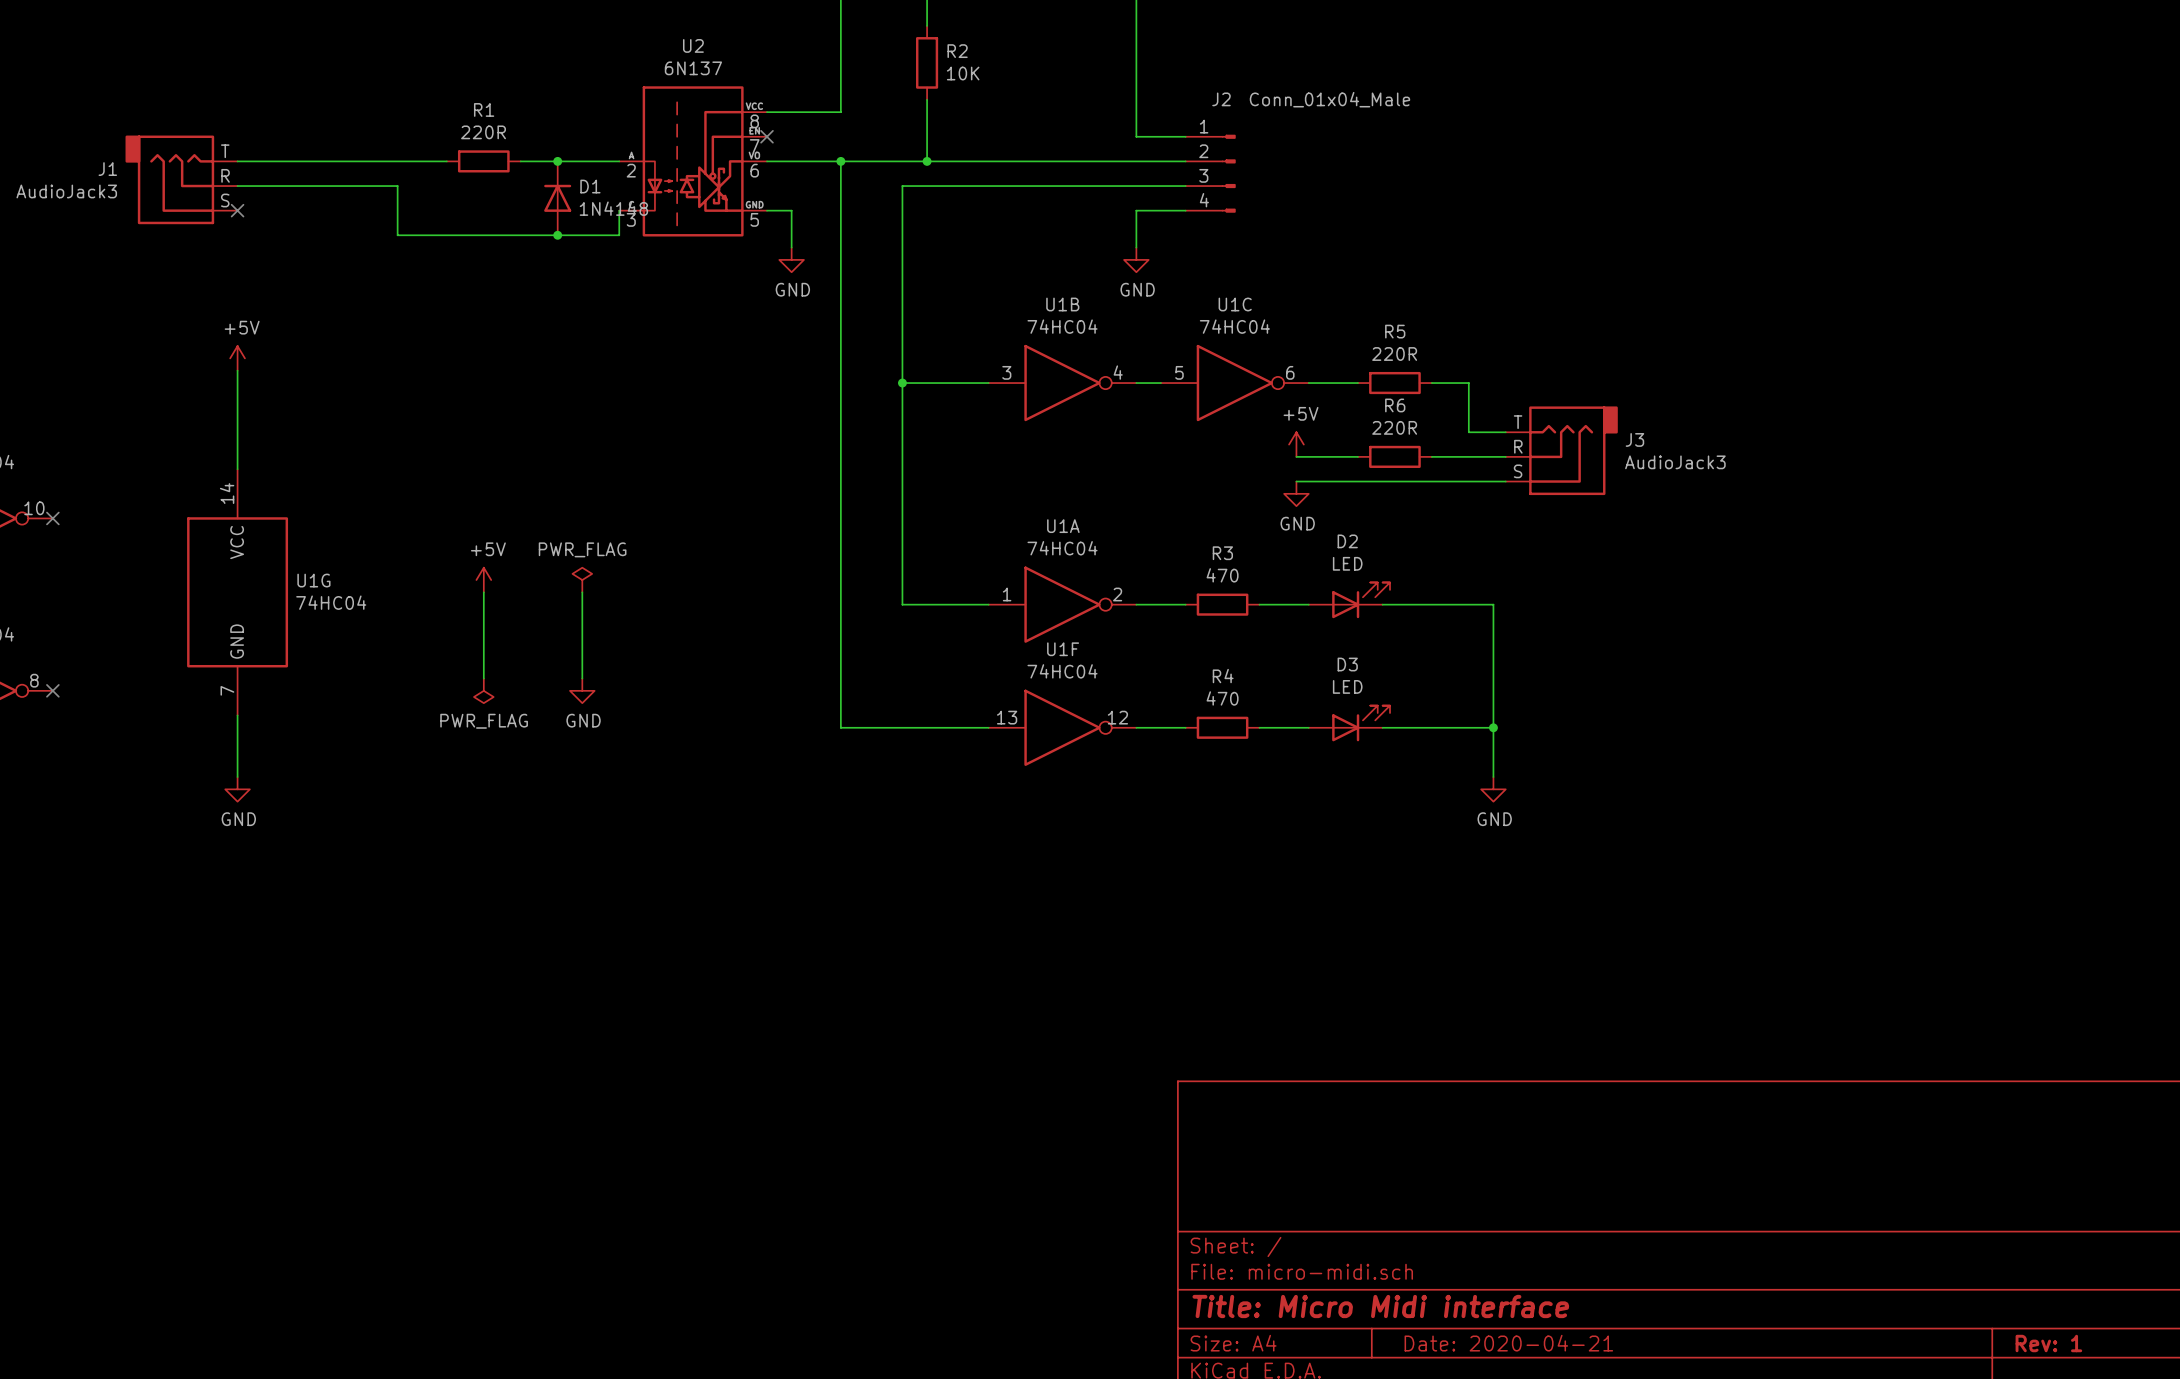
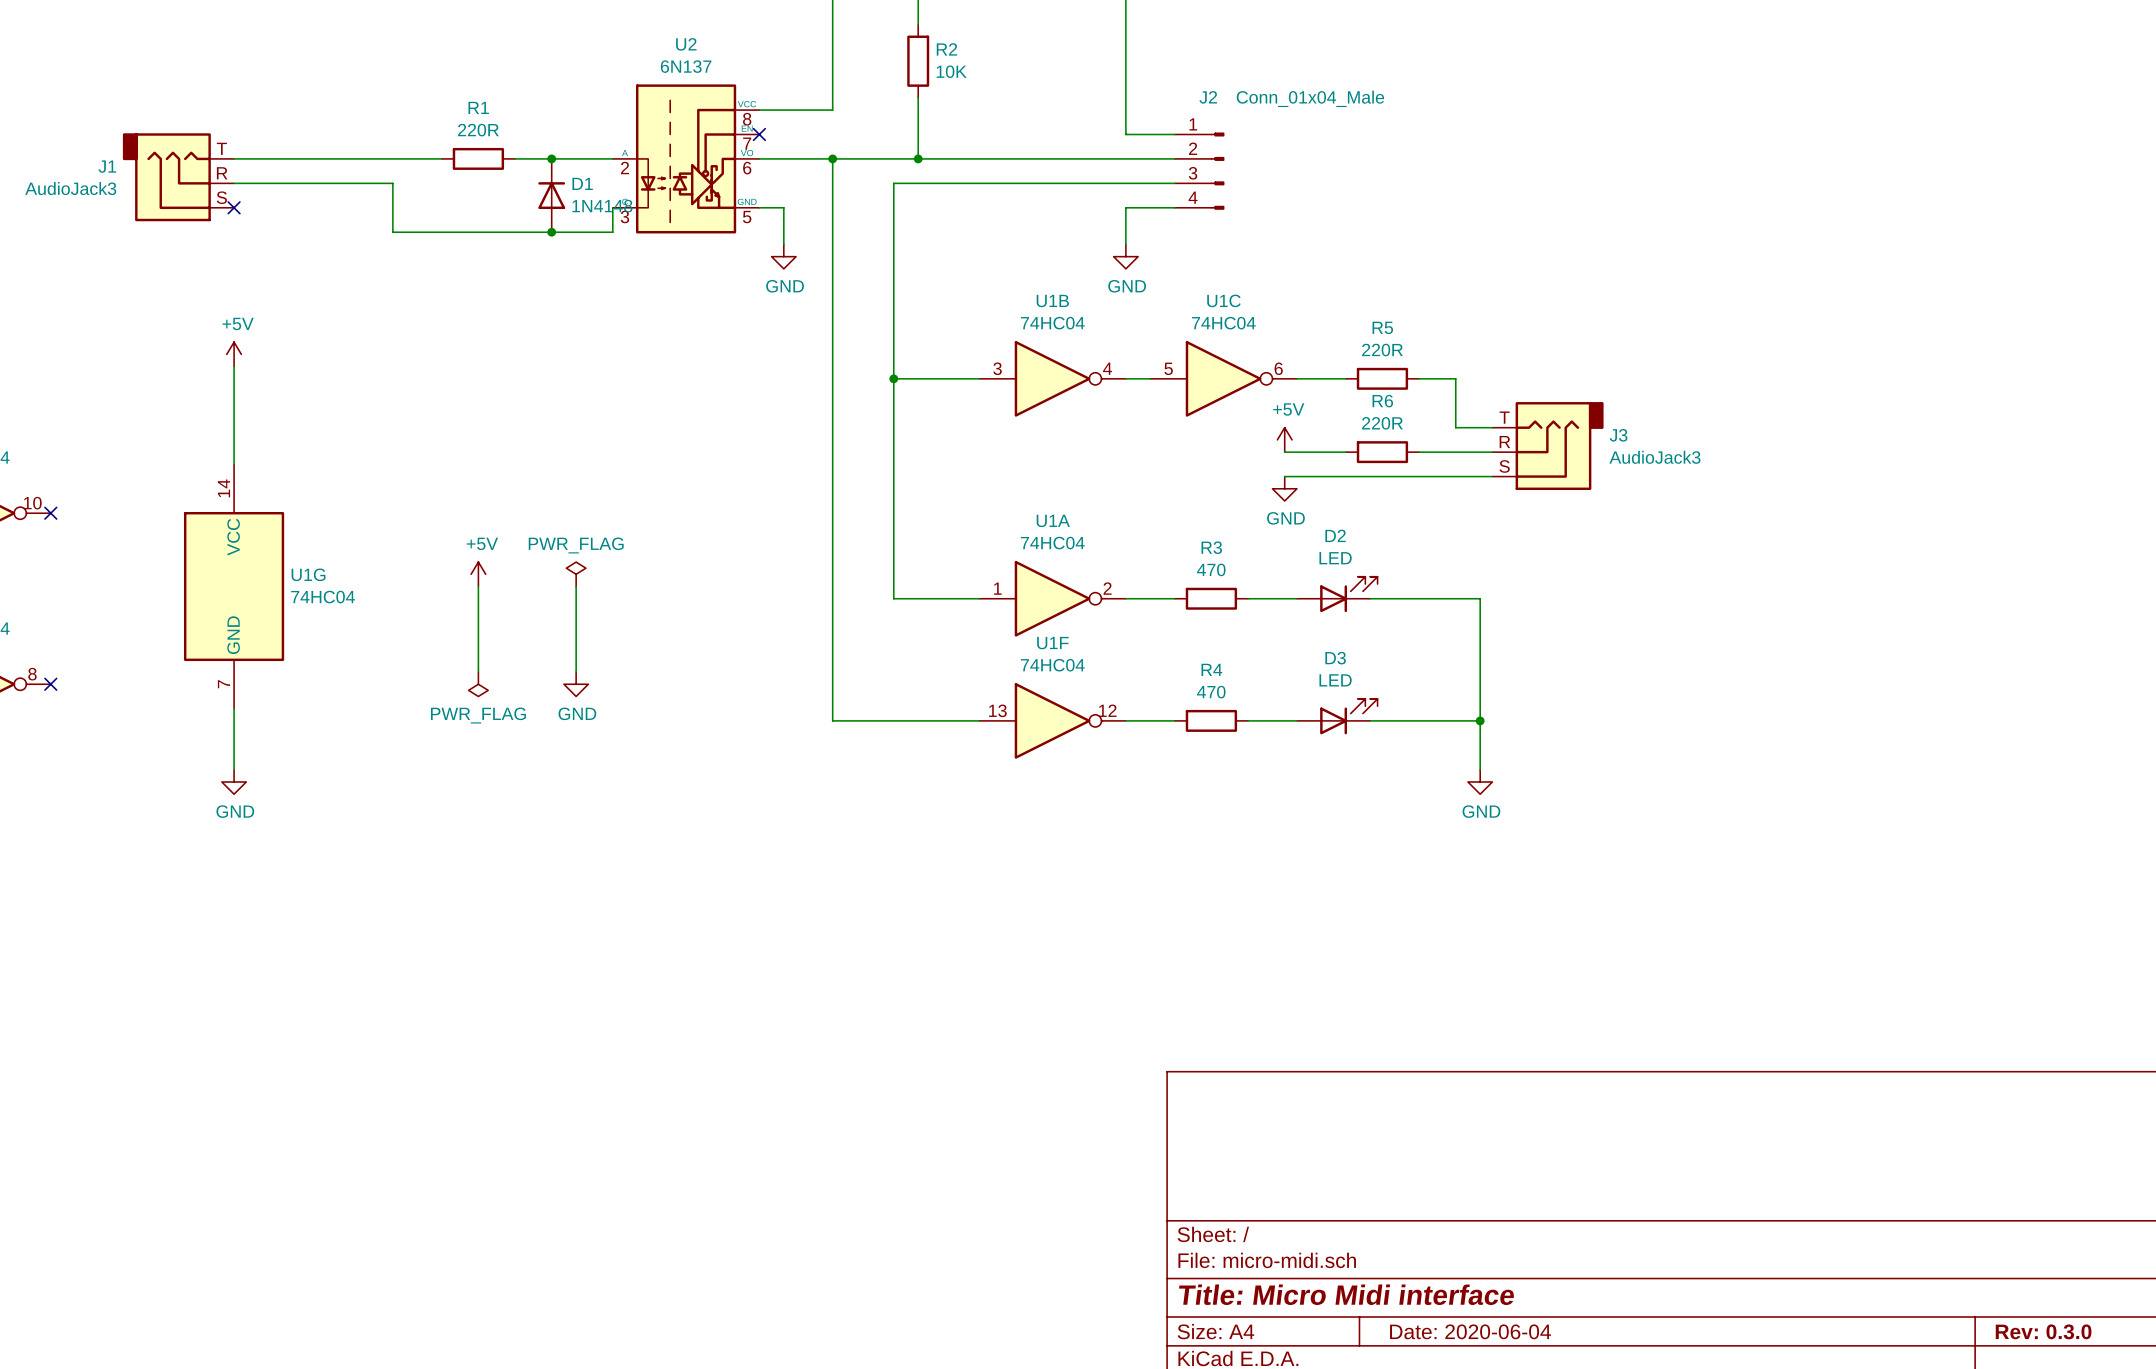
title block: Date: 2020-04-21 (1508, 1343) -> Date: 2020-06-04 (1470, 1331)
title block: Rev: 1 (2048, 1343) -> Rev: 0.3.0 (2043, 1331)

